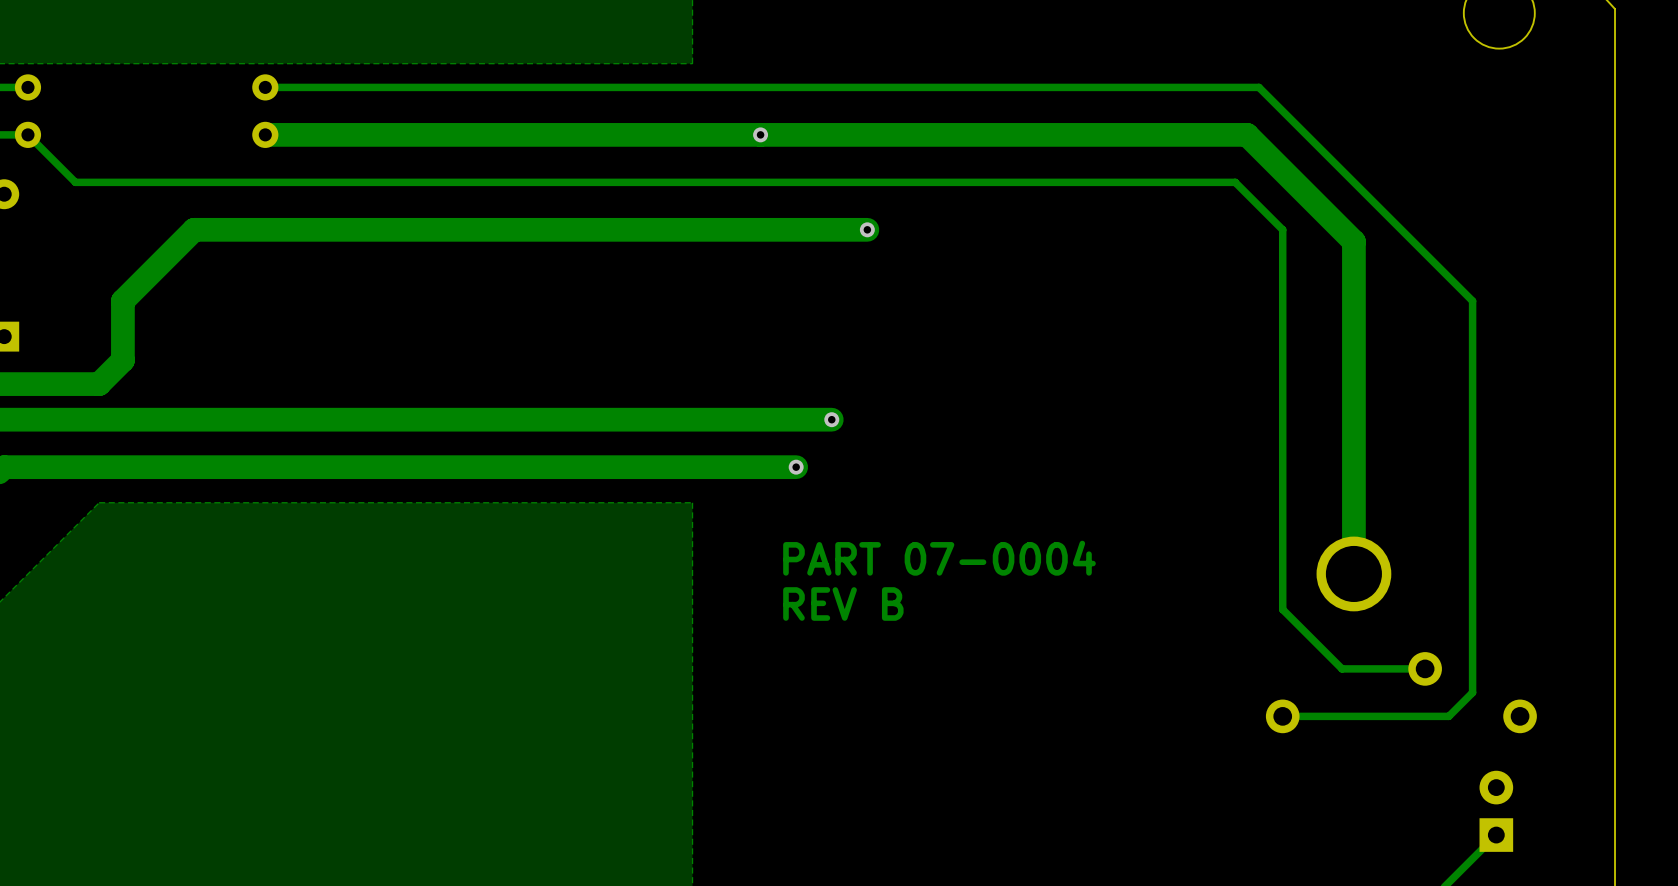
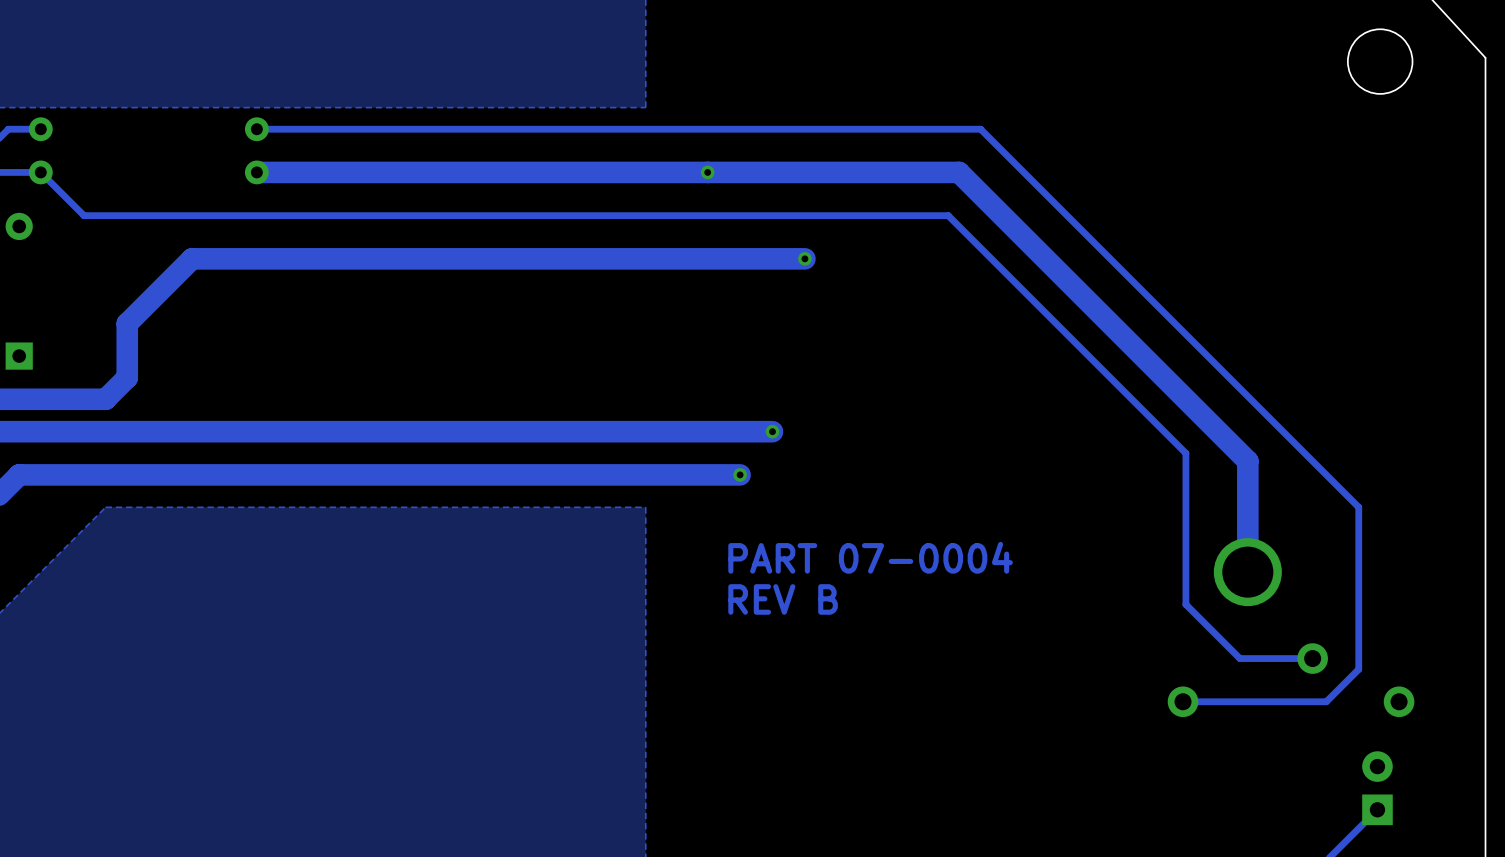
track: (1060, 87) (1258, 87) (1472, 301) (1472, 692) (1448, 716) (1440, 716) -> (980, 129) (1358, 507) (1358, 669) (1326, 701)
track: (1036, 134) (1247, 134) (1353, 241) (1353, 452) -> (959, 172) (1247, 461)
track: (1024, 182) (1235, 182) (1282, 229) (1282, 609) (1342, 668) (1345, 668) -> (948, 215) (1185, 453) (1185, 604) (1239, 658)

